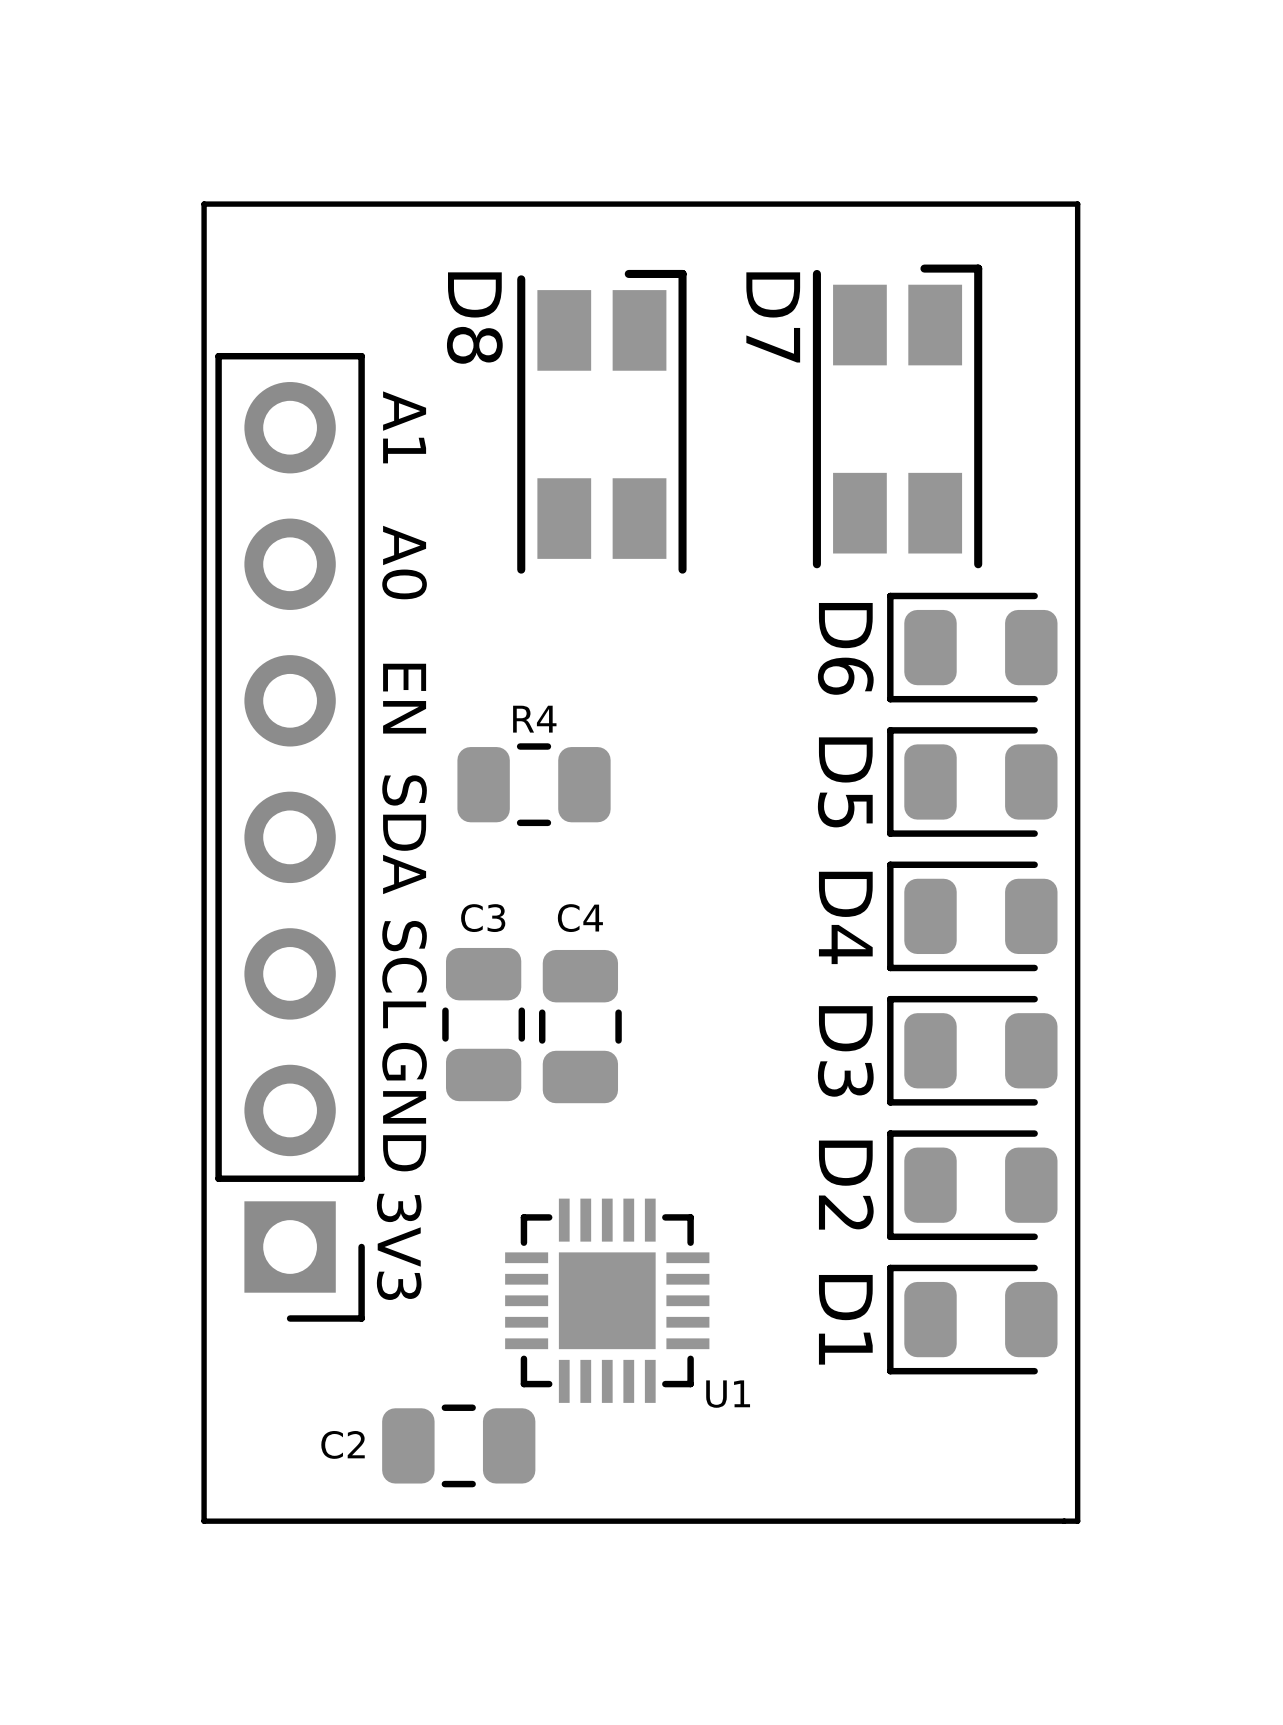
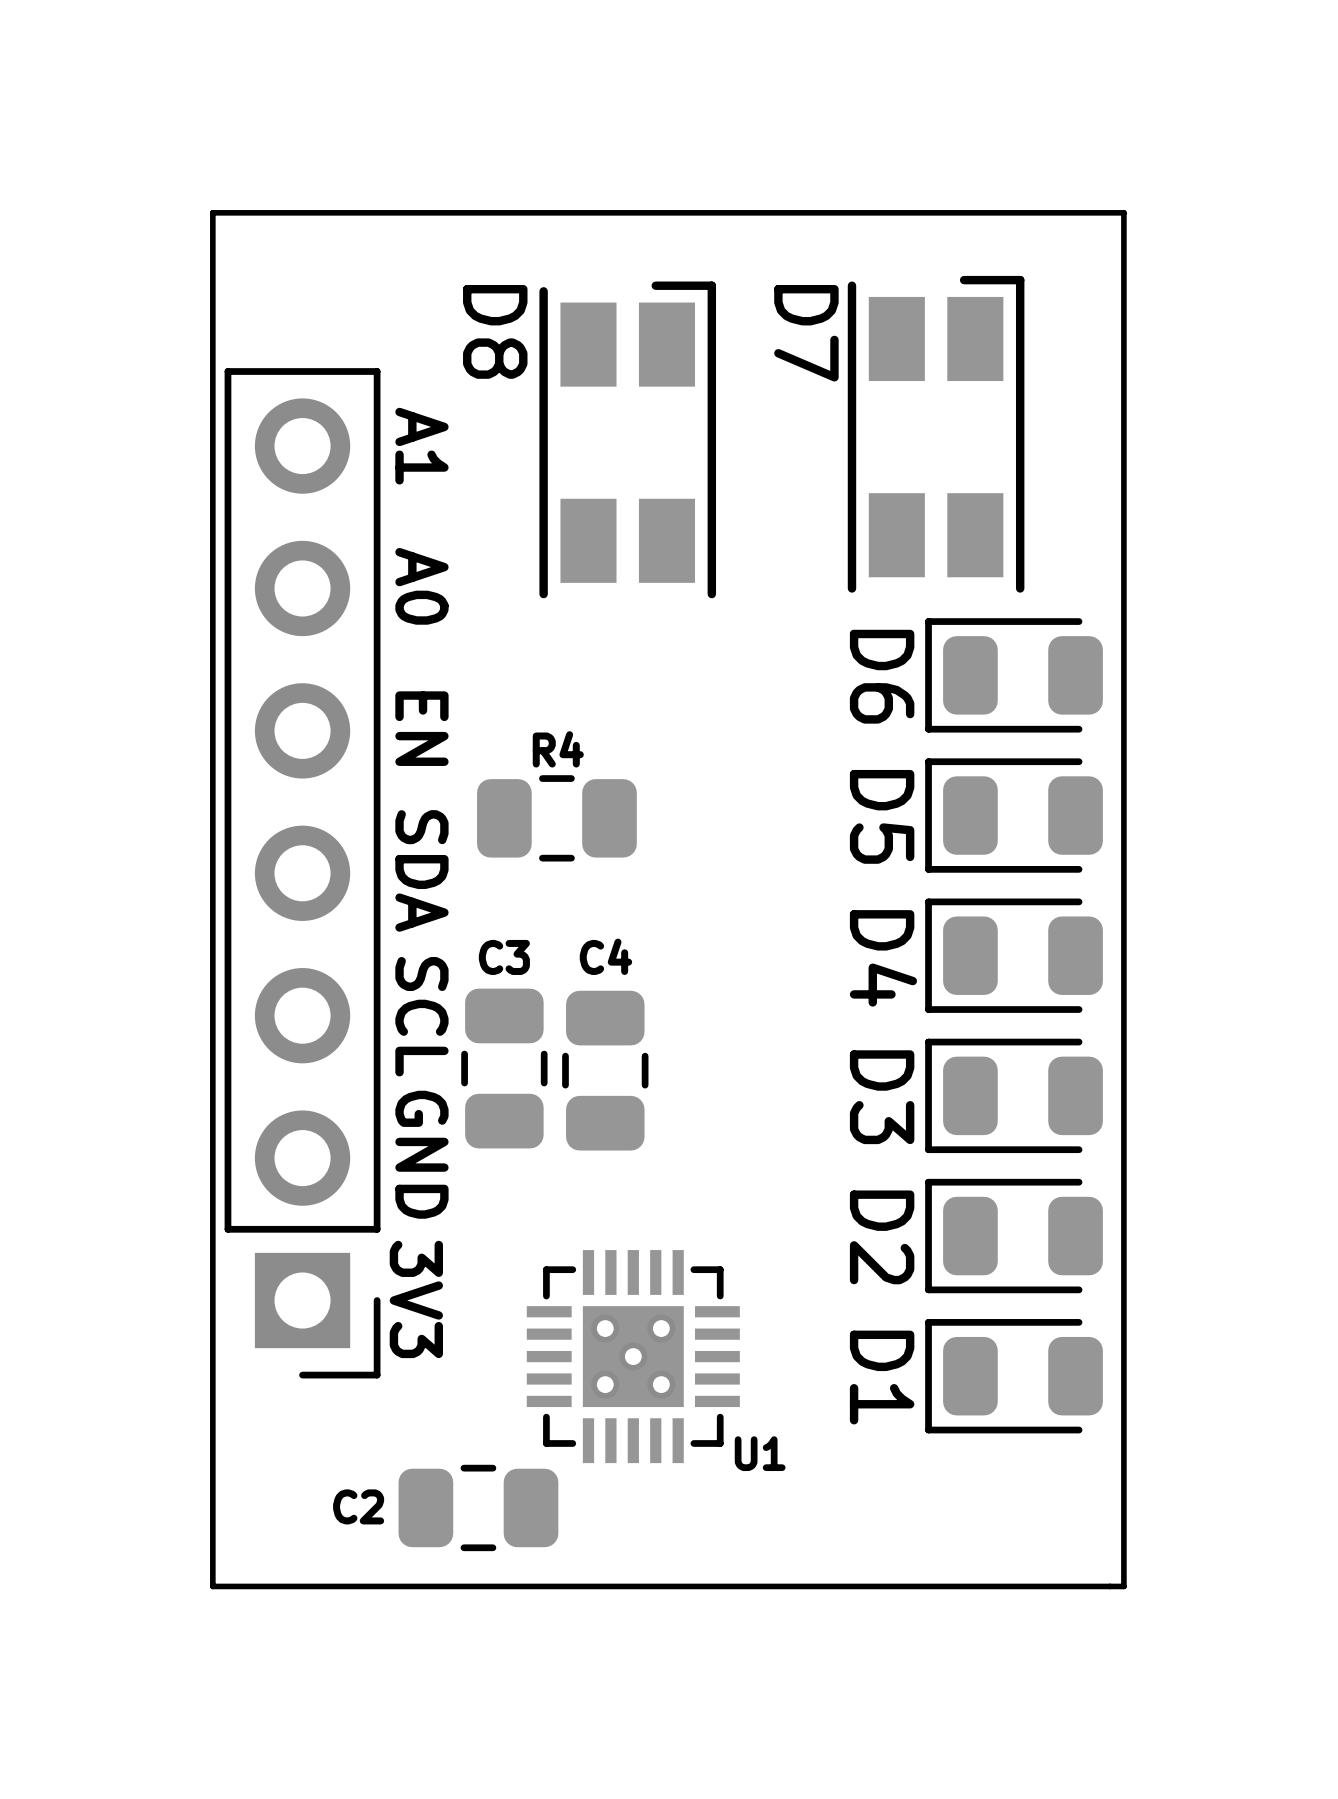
U1 footprint: [505, 1198, 710, 1403] -> [526, 1250, 740, 1464]

